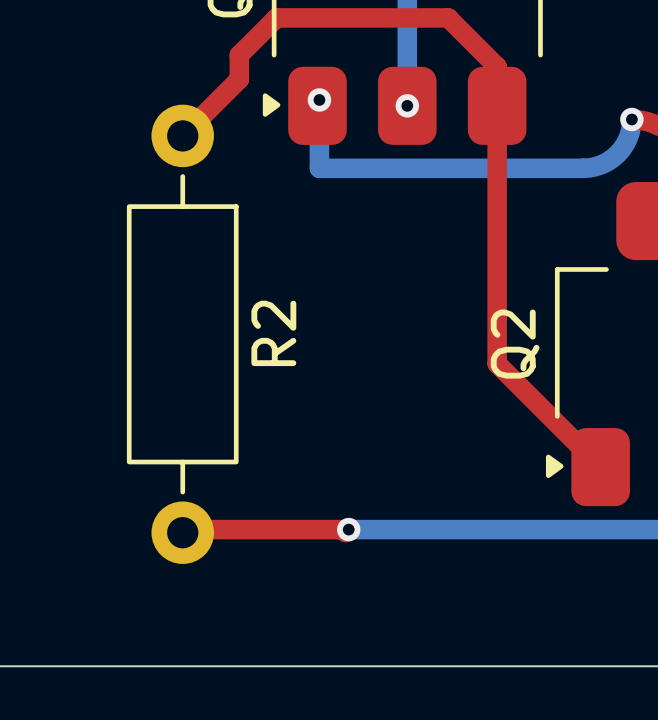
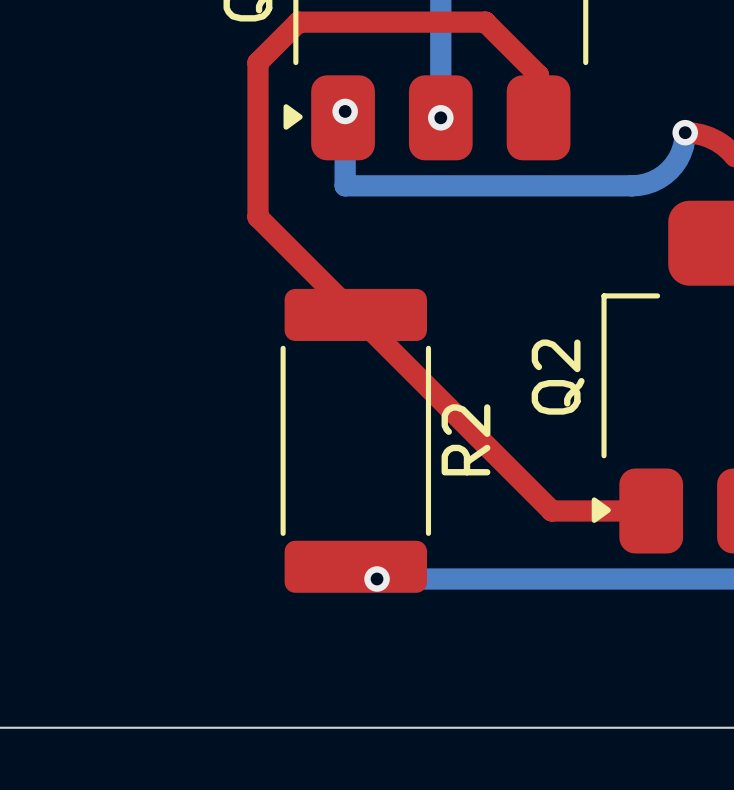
top track: (239, 79) (182, 135) -> none
R2 footprint: [126, 104, 239, 564] -> [280, 288, 432, 593]
top track: (497, 105) (497, 363) (600, 467) -> (257, 88) (257, 217) (551, 510) (651, 510)
top track: (182, 532) (185, 529) (348, 529) (345, 532) -> none

